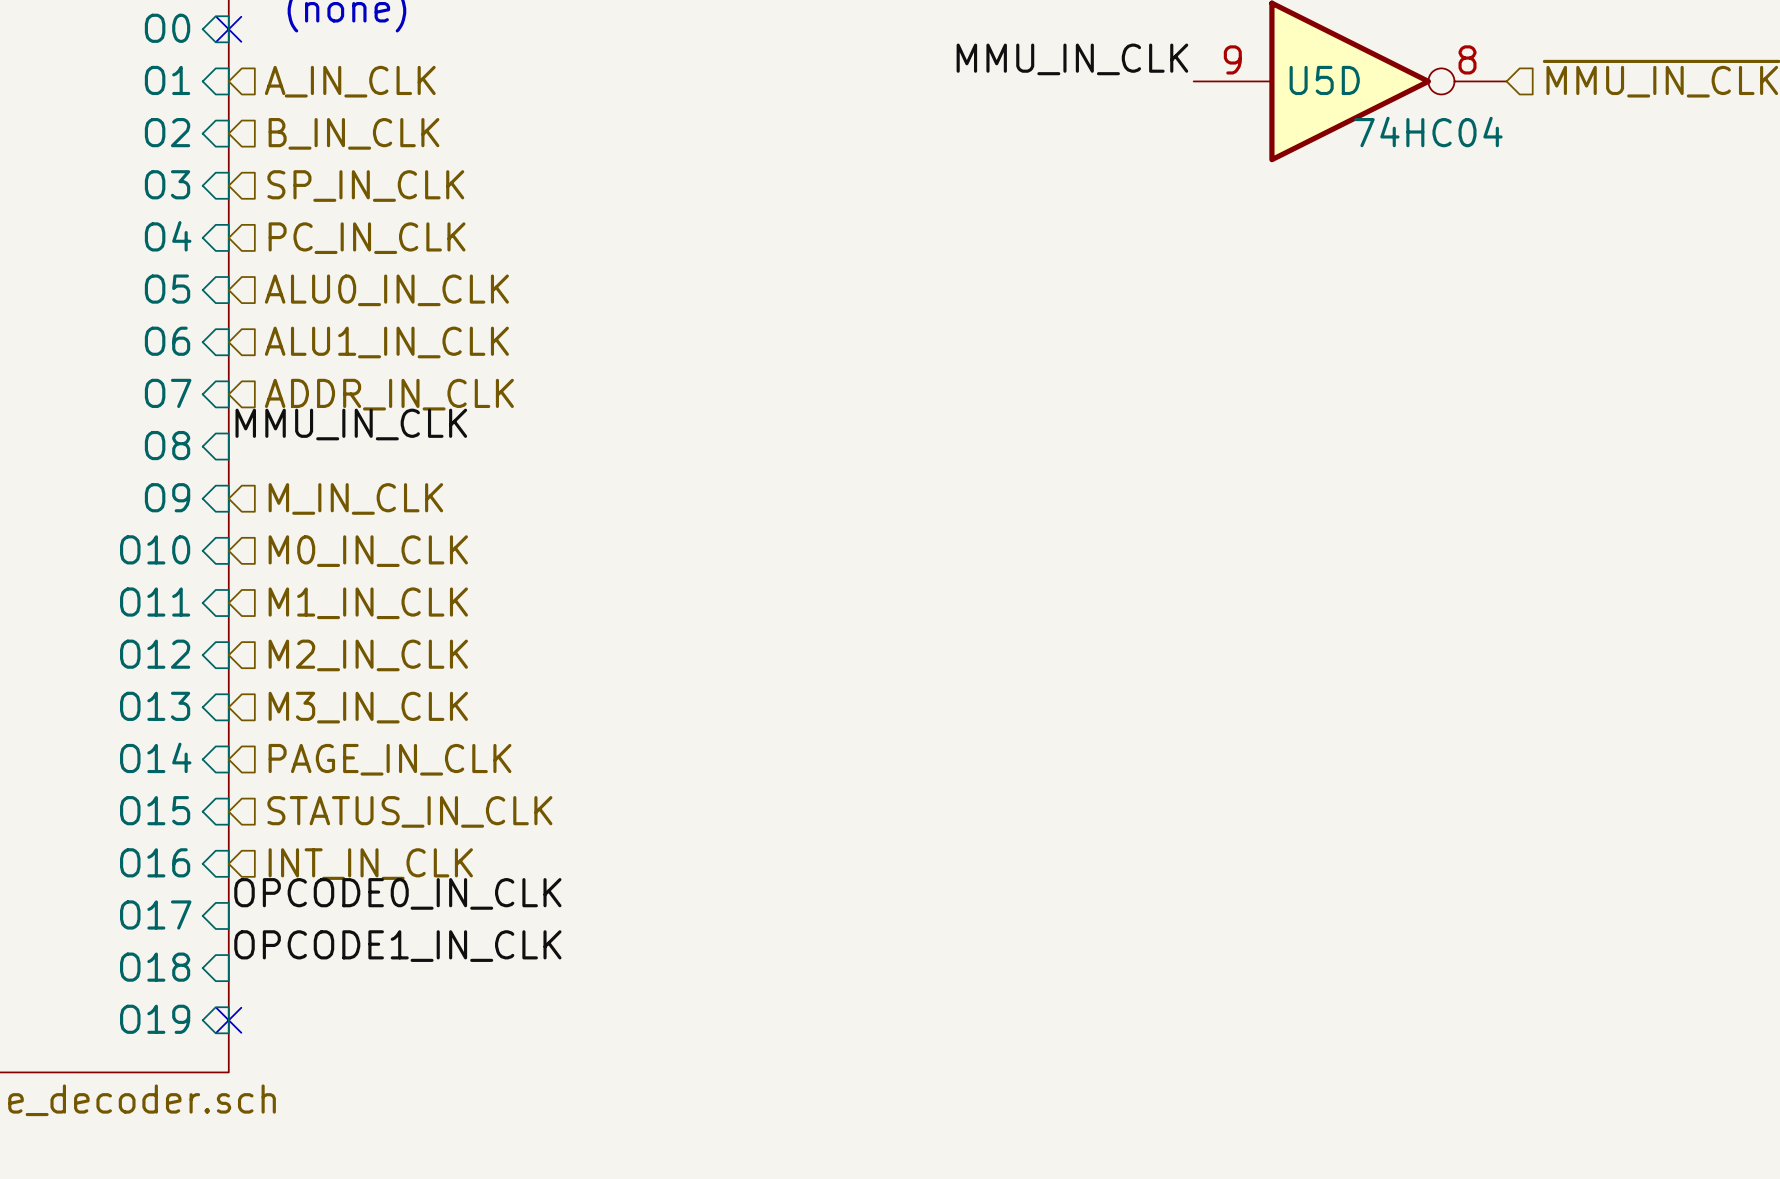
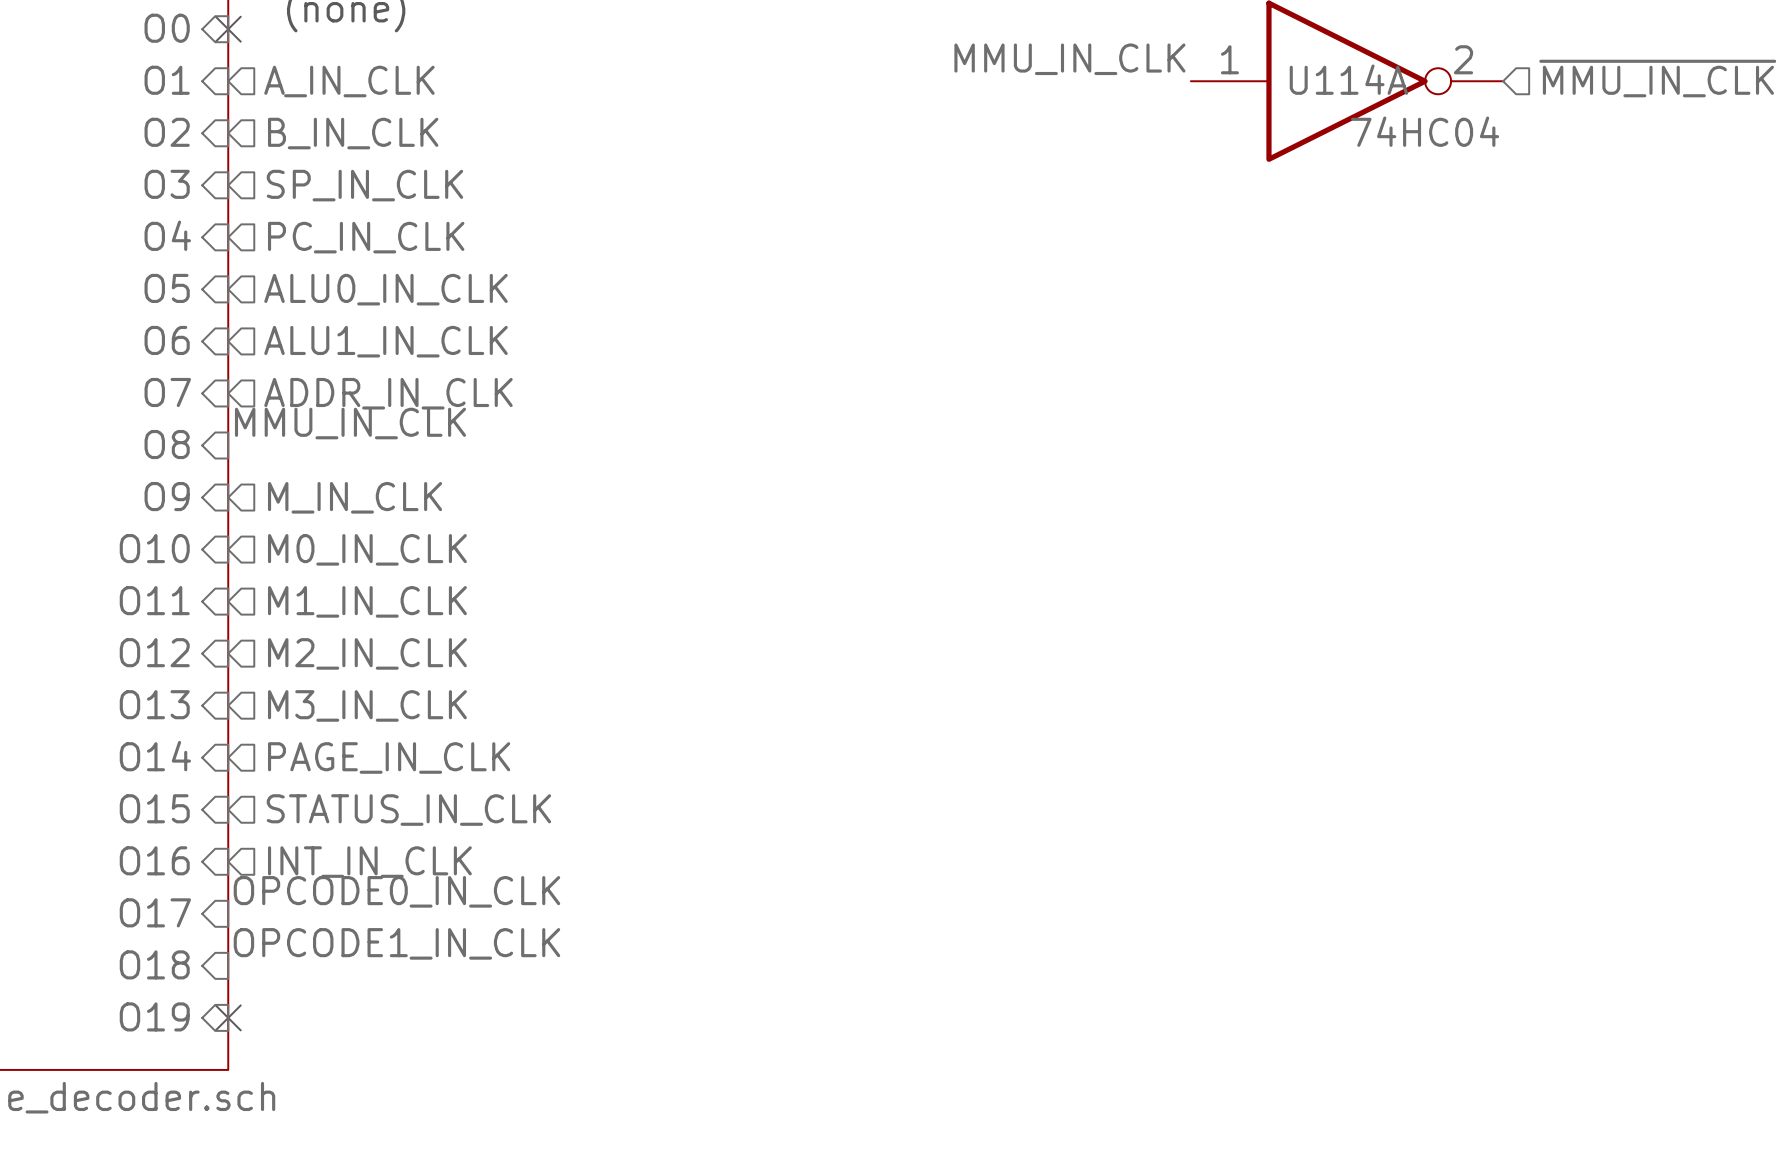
U5D pin number: 9 (1232, 59) -> 1 (1229, 59)
U5D pin number: 8 (1467, 59) -> 2 (1463, 59)
U5D name: U5D (1324, 80) -> U114A (1348, 79)

